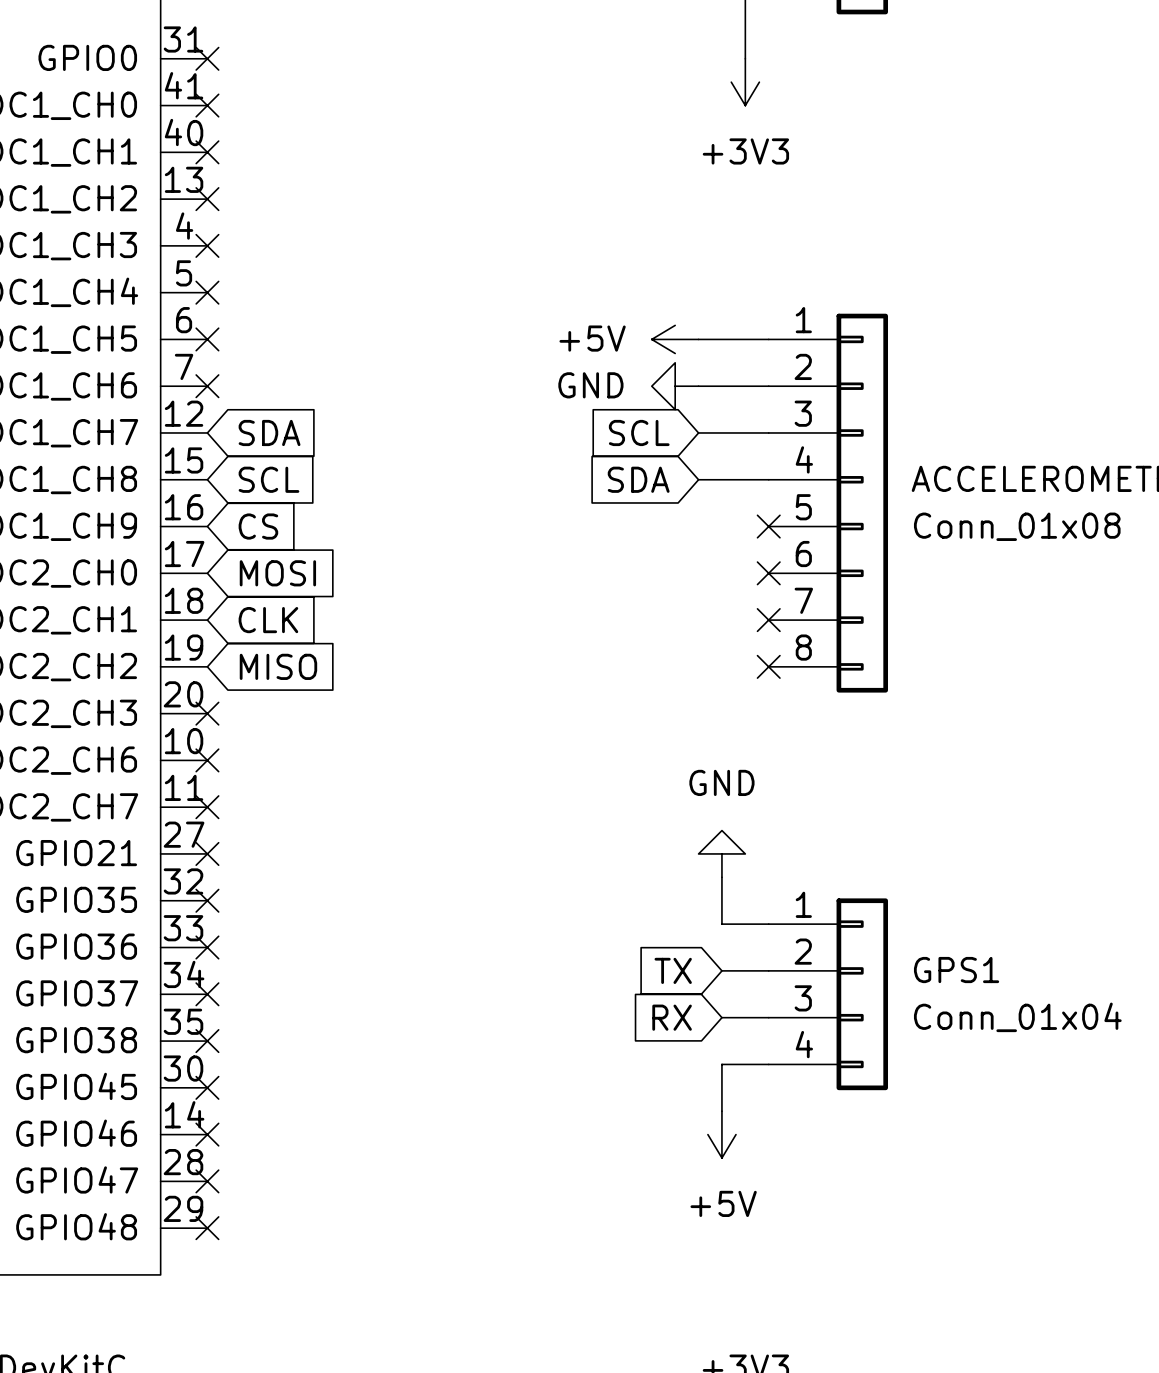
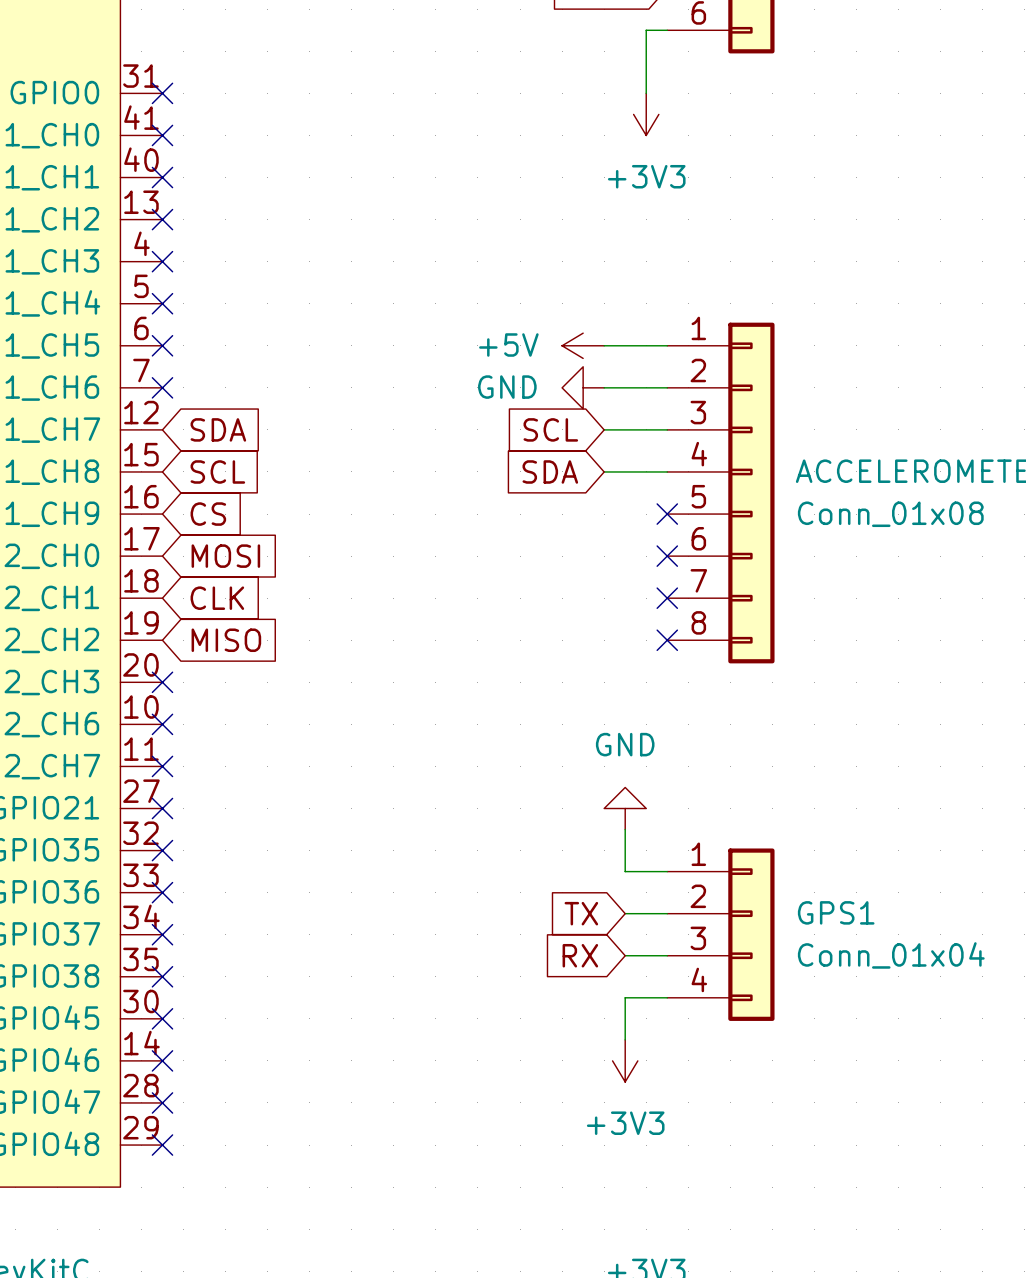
power symbol: +5V (721, 1134) -> +3V3 (625, 1060)

